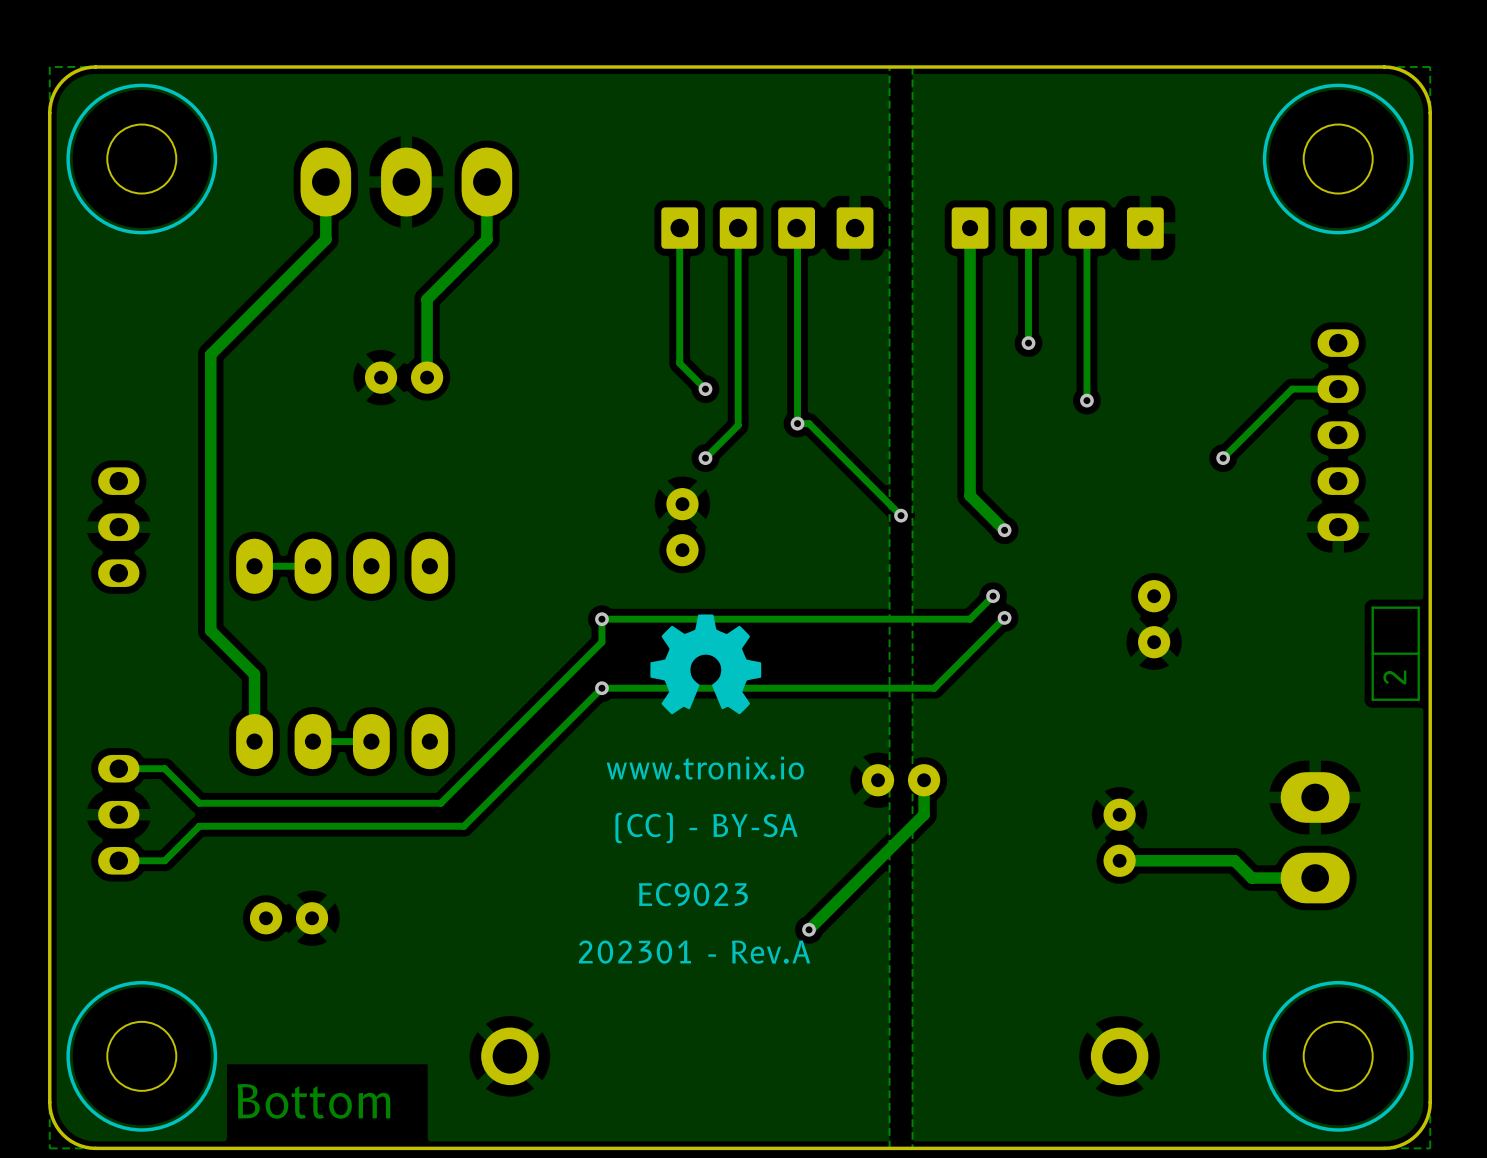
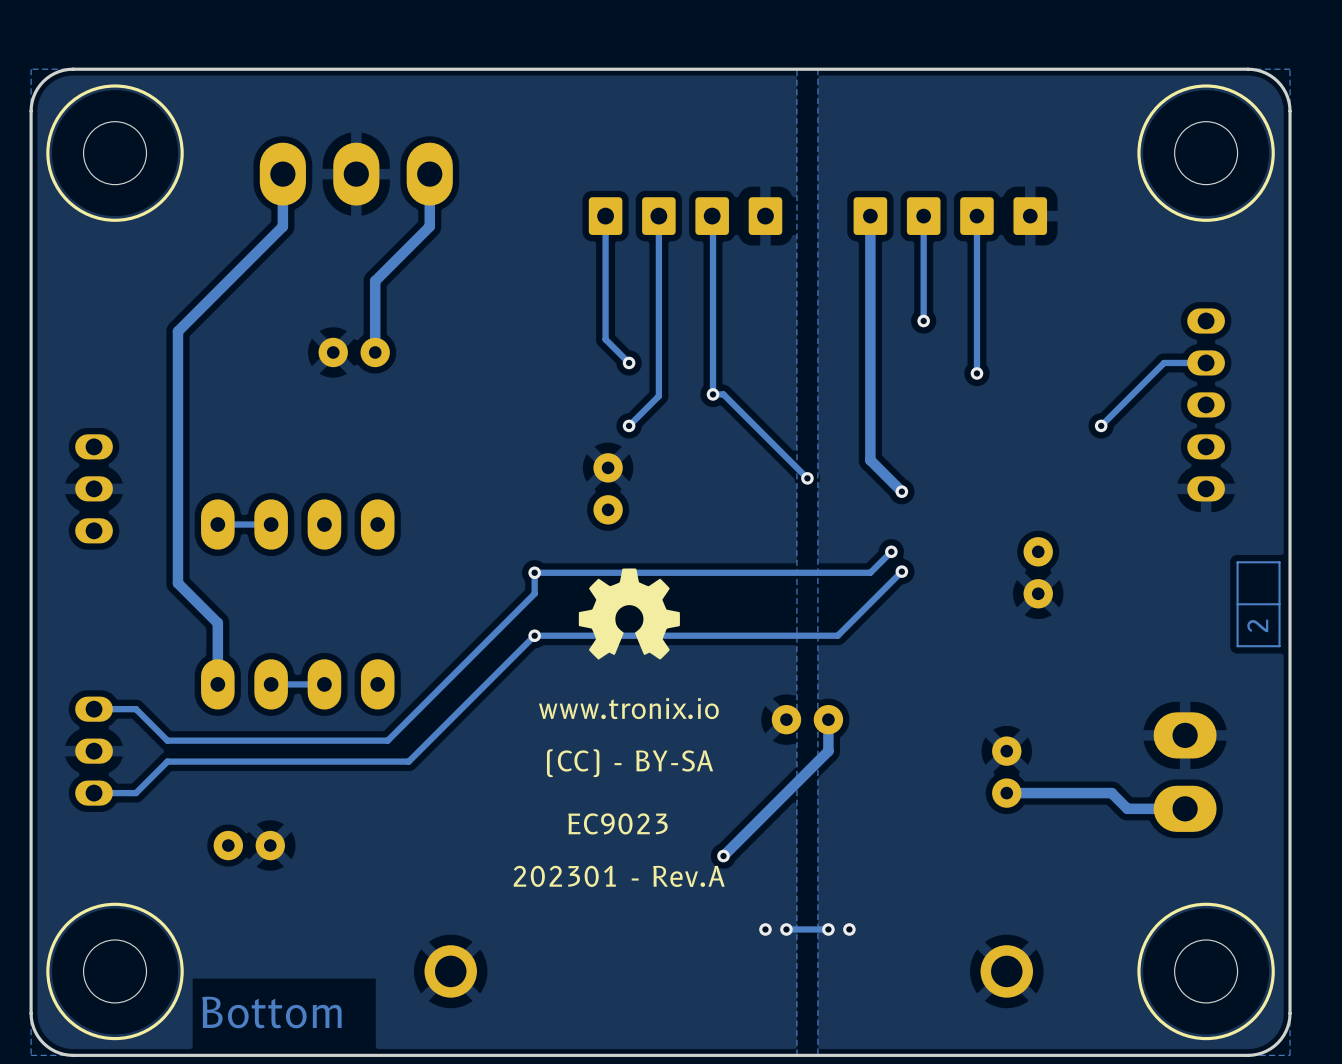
via: none -> (765, 929)
via: none -> (786, 929)
track: none -> (828, 929) (786, 929)
via: none -> (828, 929)
via: none -> (849, 929)

